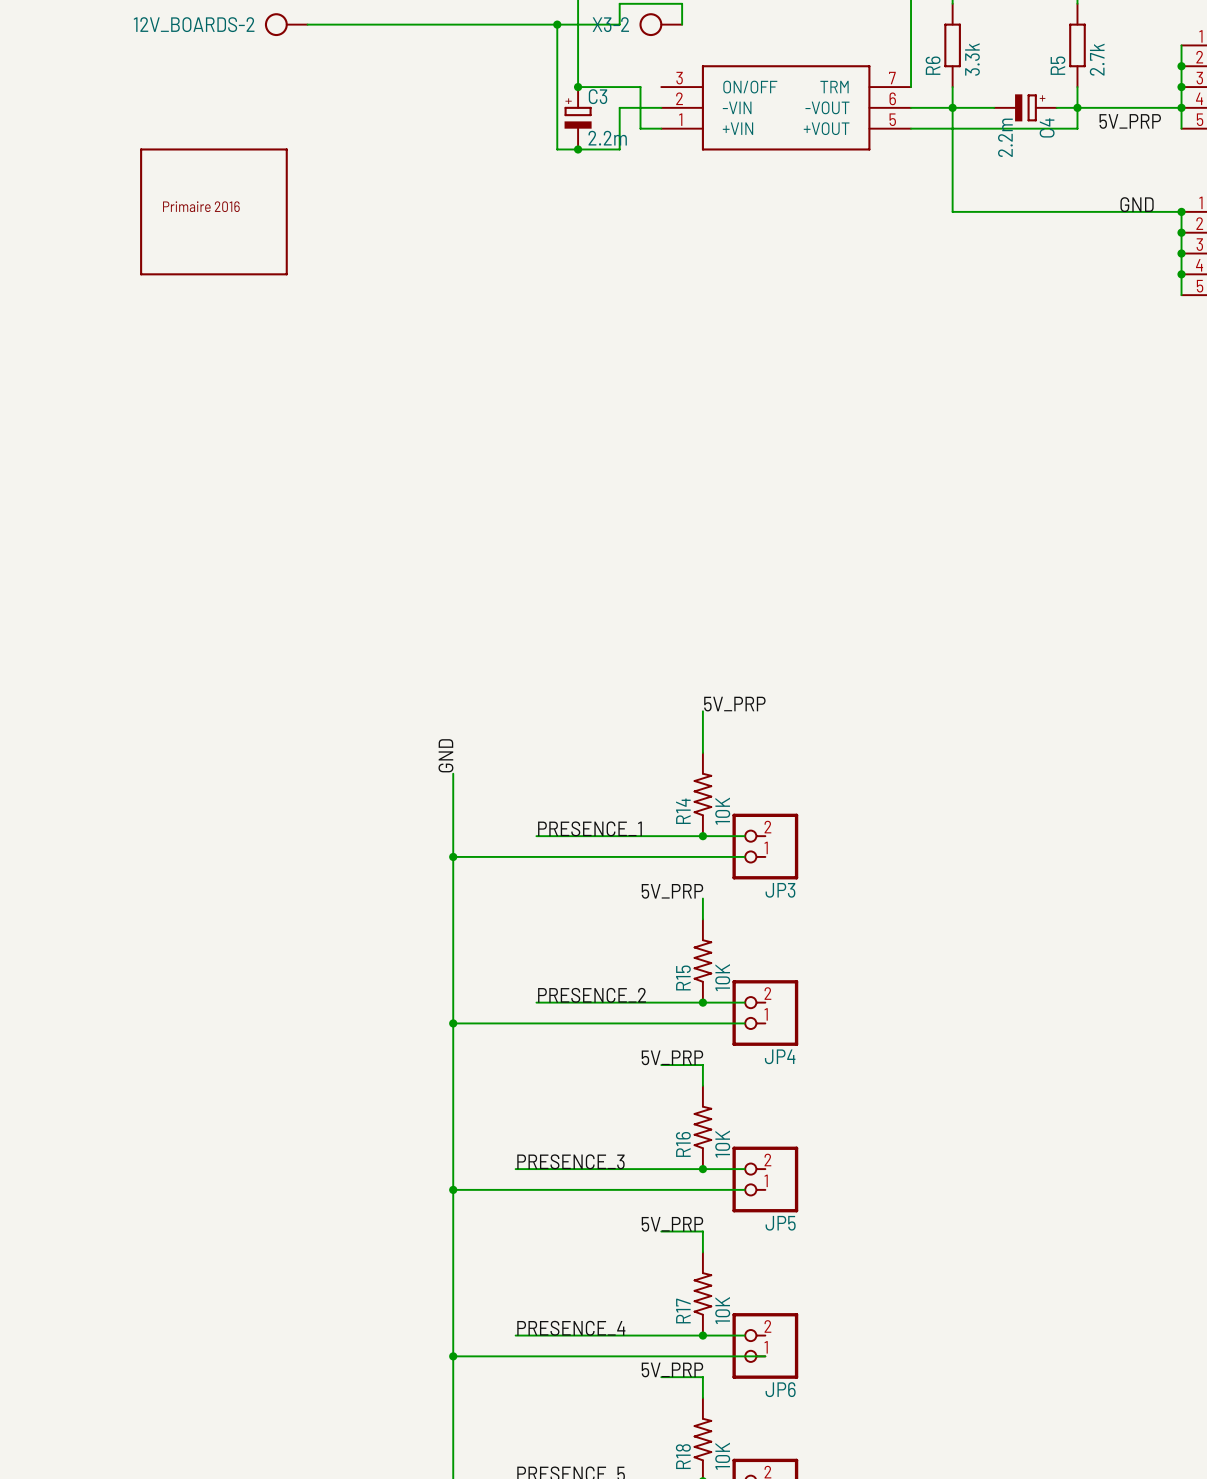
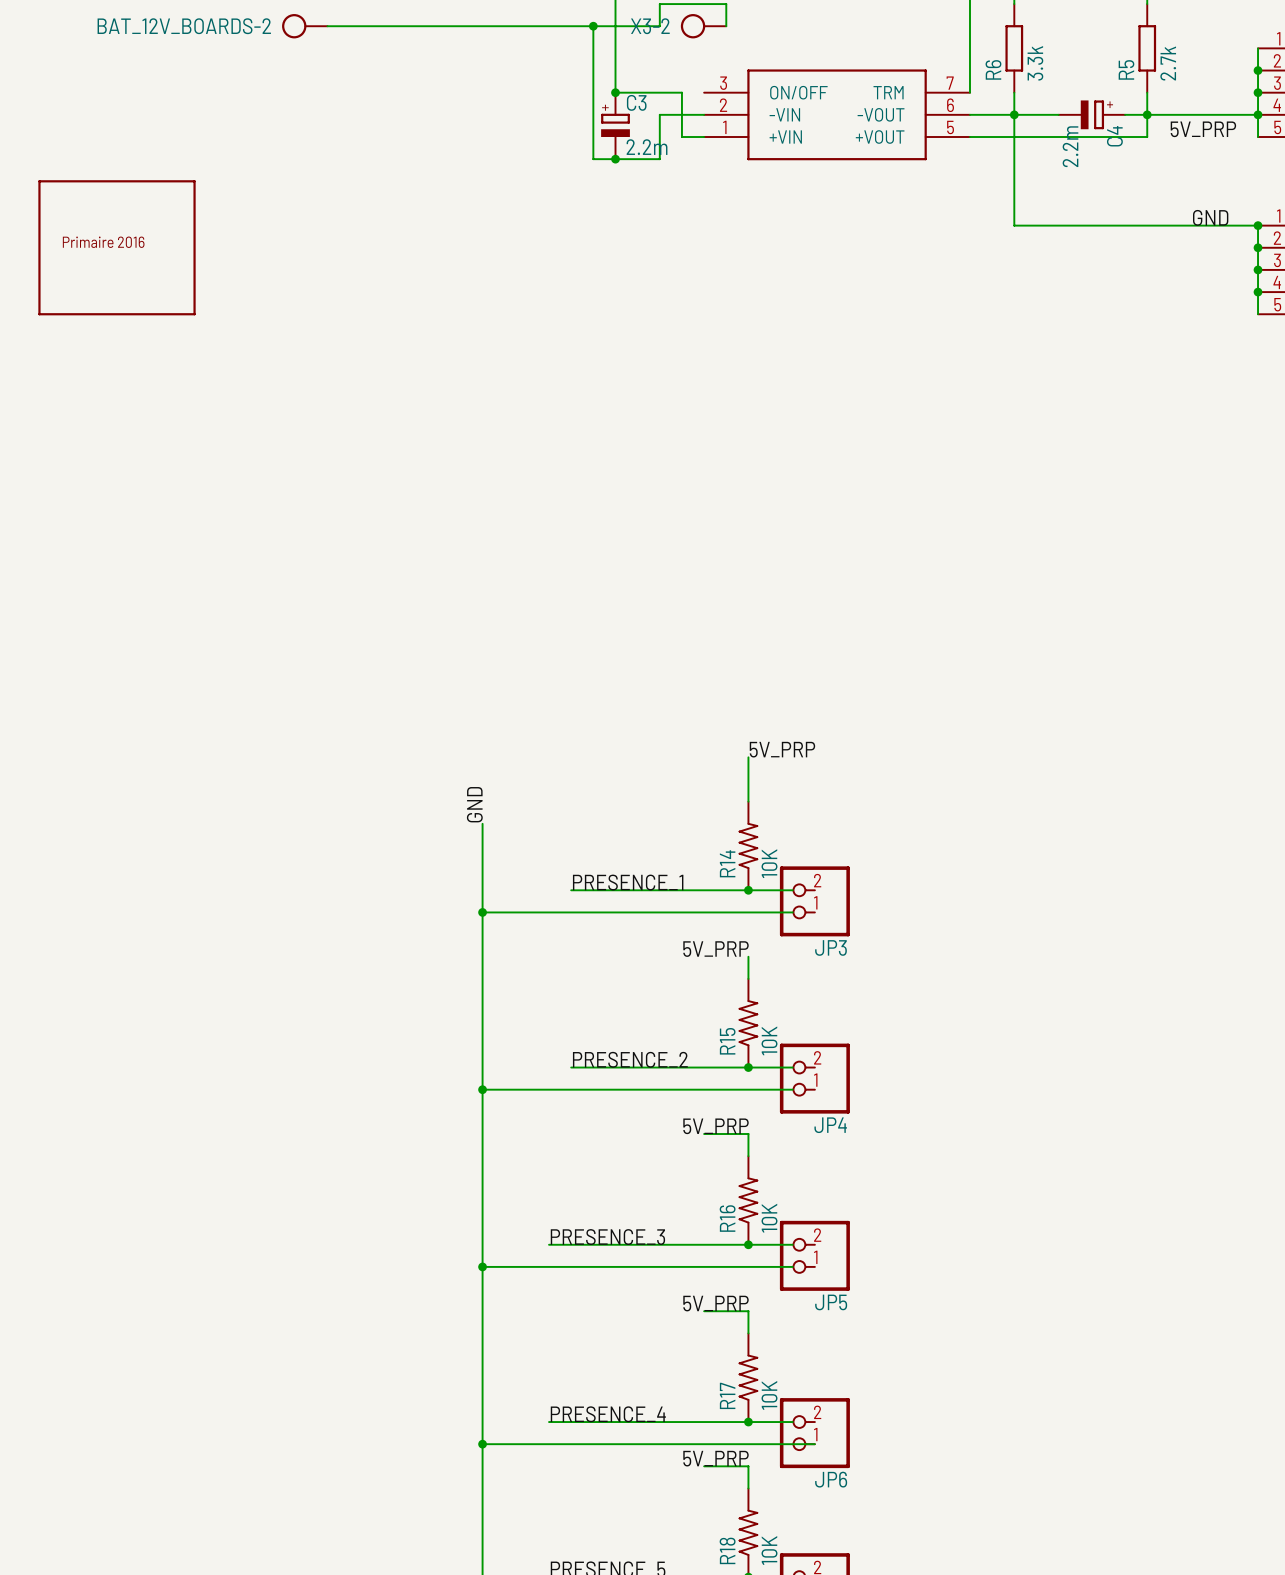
12V_BOARDS-2 name: 12V_BOARDS-2 (194, 24) -> BAT_12V_BOARDS-2 (184, 26)
part position: (213, 211) -> (117, 247)

